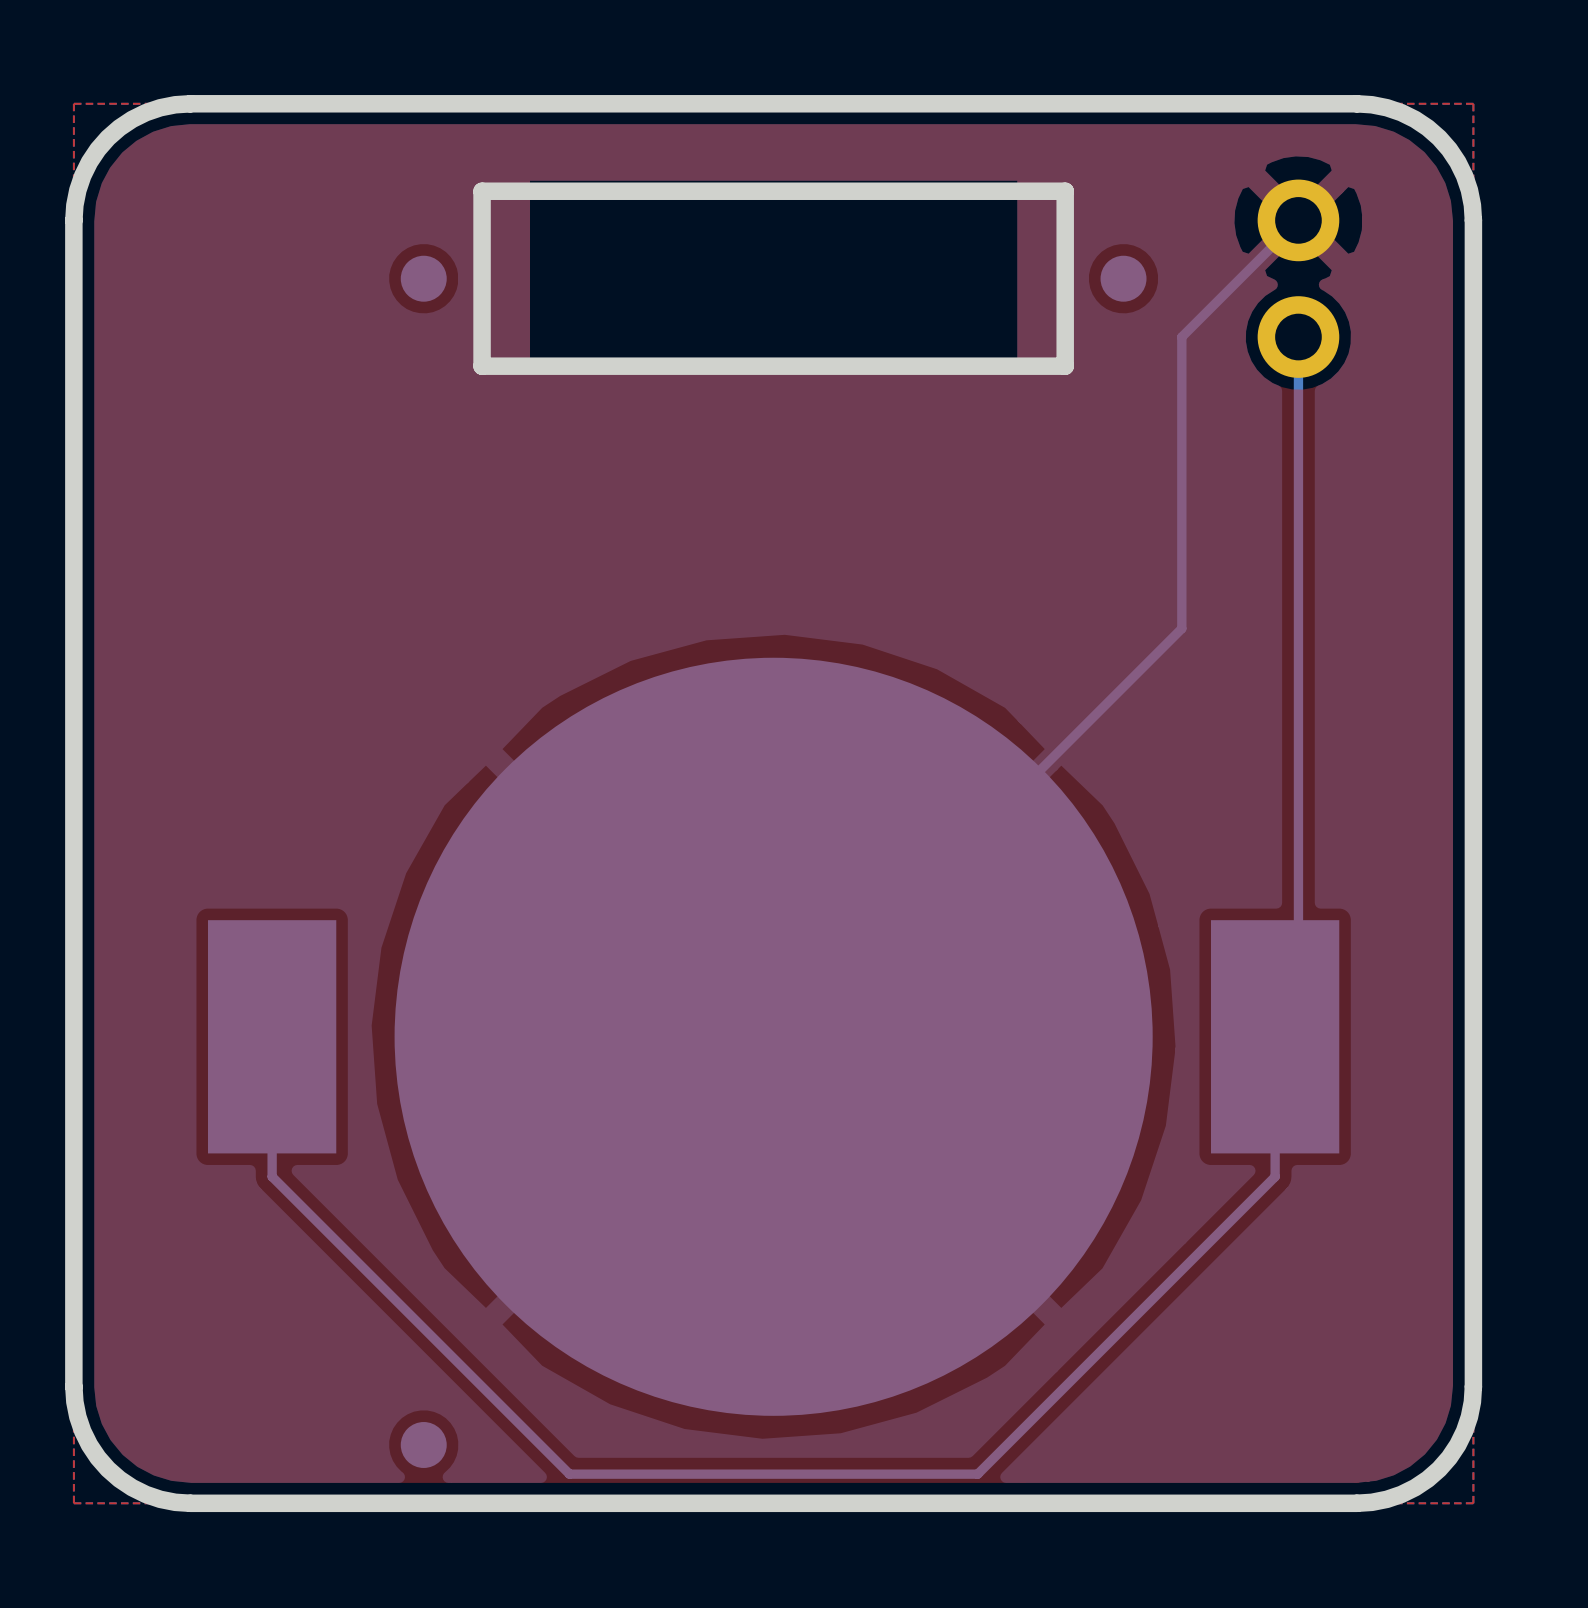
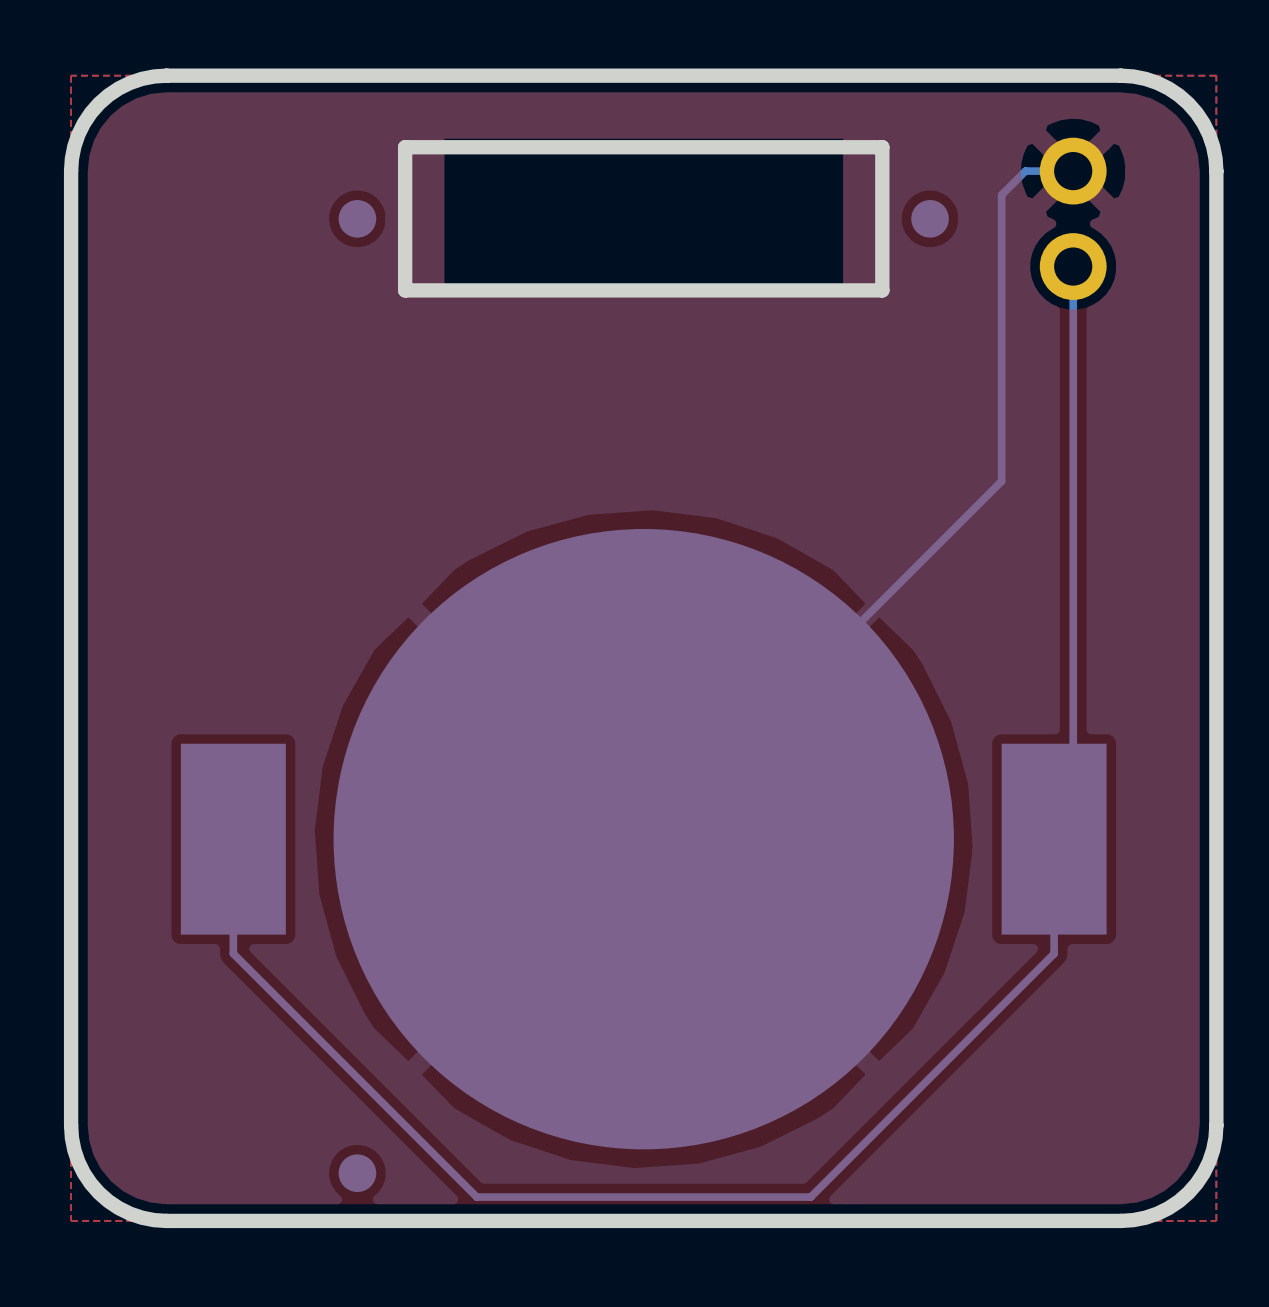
bottom track: (1298, 220) (1181, 337) (1181, 628) -> (1073, 171) (1025, 171) (1001, 194) (1001, 481) (977, 505)

